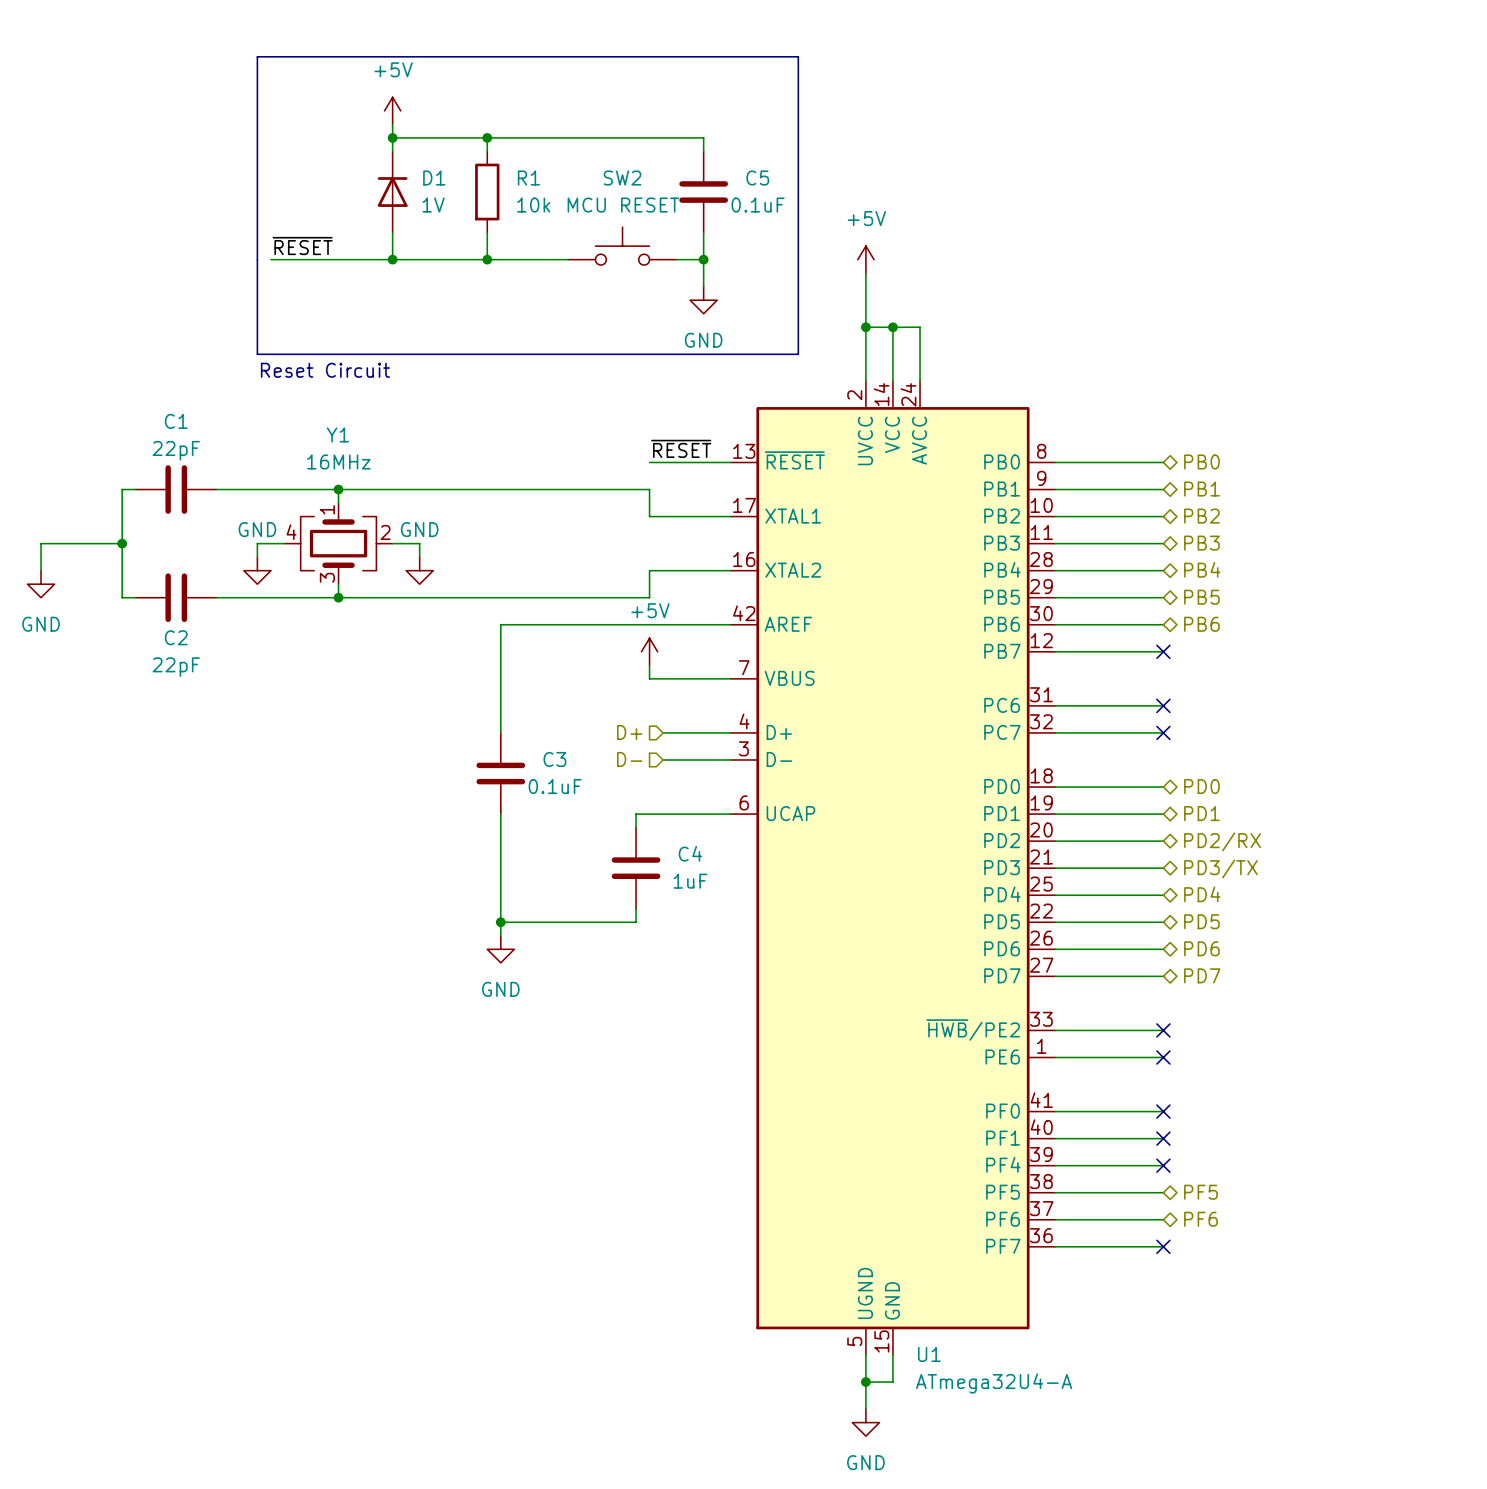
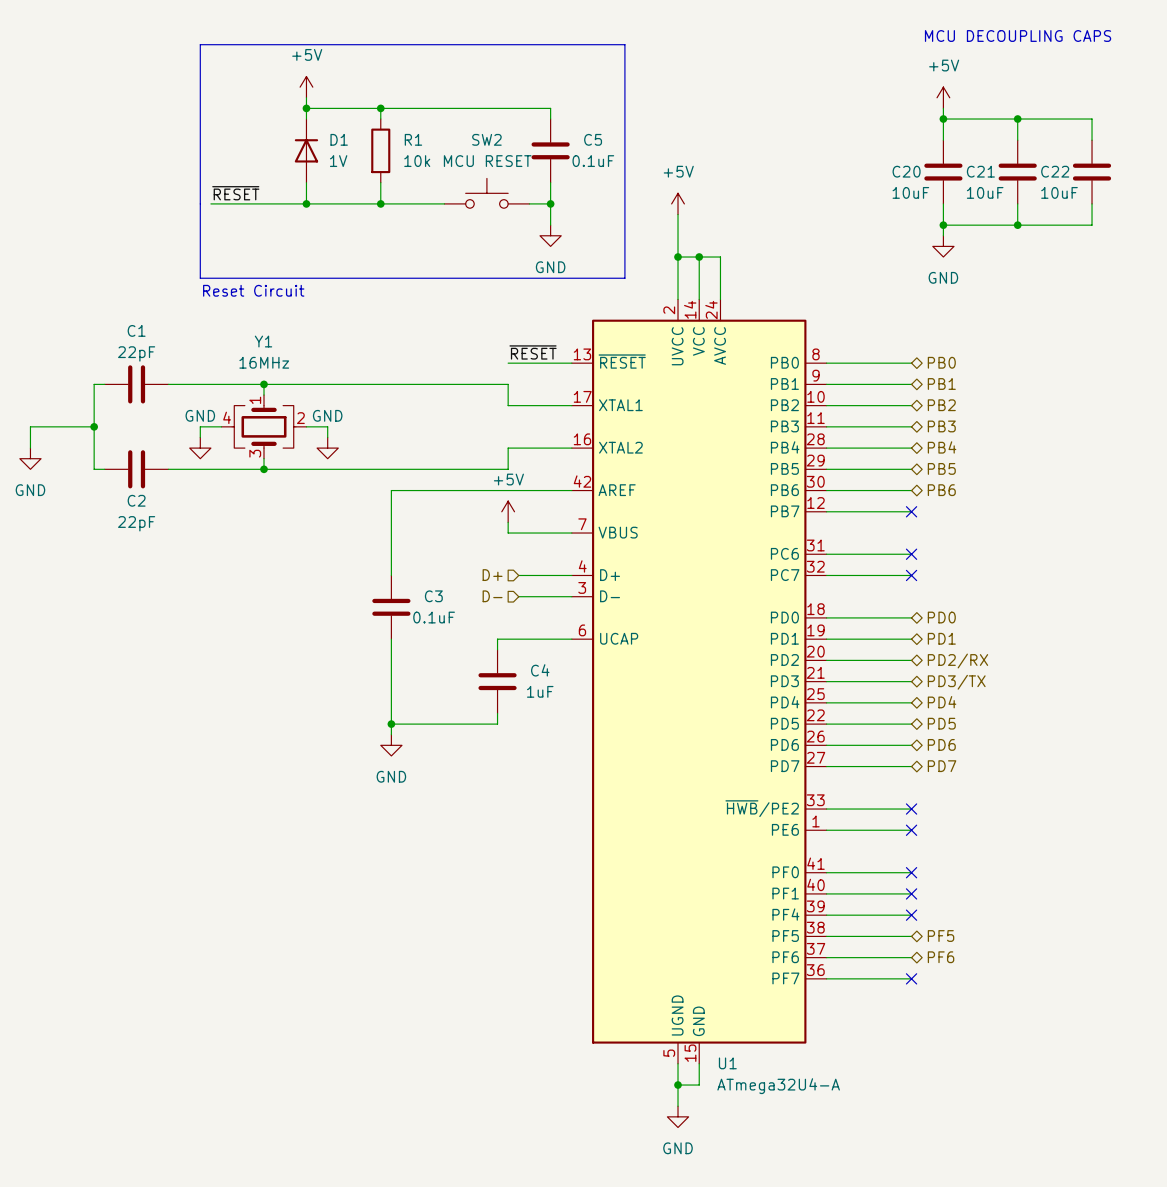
text: none -> MCU DECOUPLING CAPS (1018, 36)
power symbol: none -> +5V (943, 97)
wire: none -> (943, 108) (943, 140)
wire: none -> (943, 119) (1092, 119) (1092, 140)
junction: none -> (943, 119)
wire: none -> (1017, 119) (1017, 140)
junction: none -> (1017, 119)
C20: none -> 10uF (943, 172)
C21: none -> 10uF (1017, 172)
C22: none -> 10uF (1092, 172)
wire: none -> (943, 203) (943, 235)
wire: none -> (1017, 203) (1017, 225)
wire: none -> (1092, 203) (1092, 225) (943, 225)
junction: none -> (943, 225)
junction: none -> (1017, 225)
power symbol: none -> GND (943, 246)

